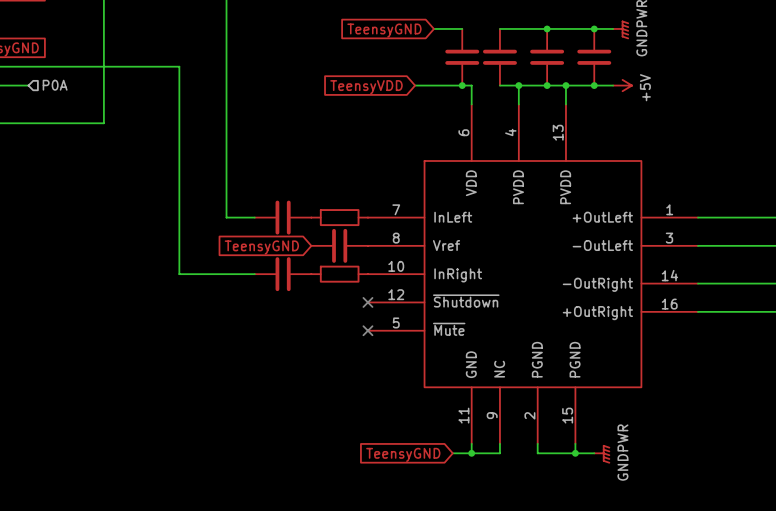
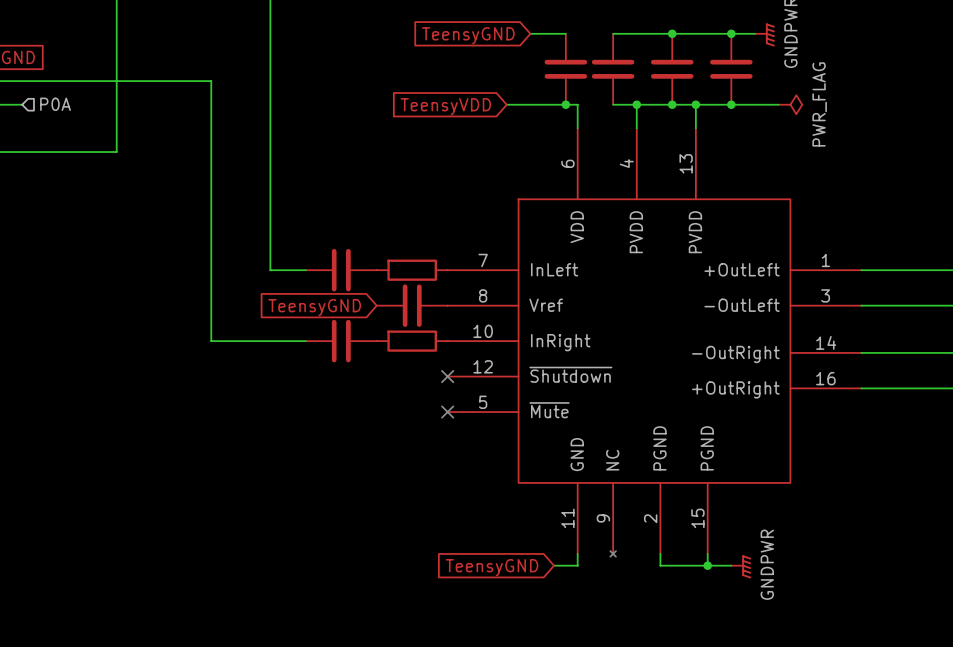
power symbol: +5V (622, 85) -> none
power symbol: none -> PWR_FLAG (790, 104)
part symbol: [367, 104, 698, 444] -> [447, 128, 862, 557]
wire: (499, 443) (499, 453) (471, 453) -> none
junction: (471, 453) -> none

